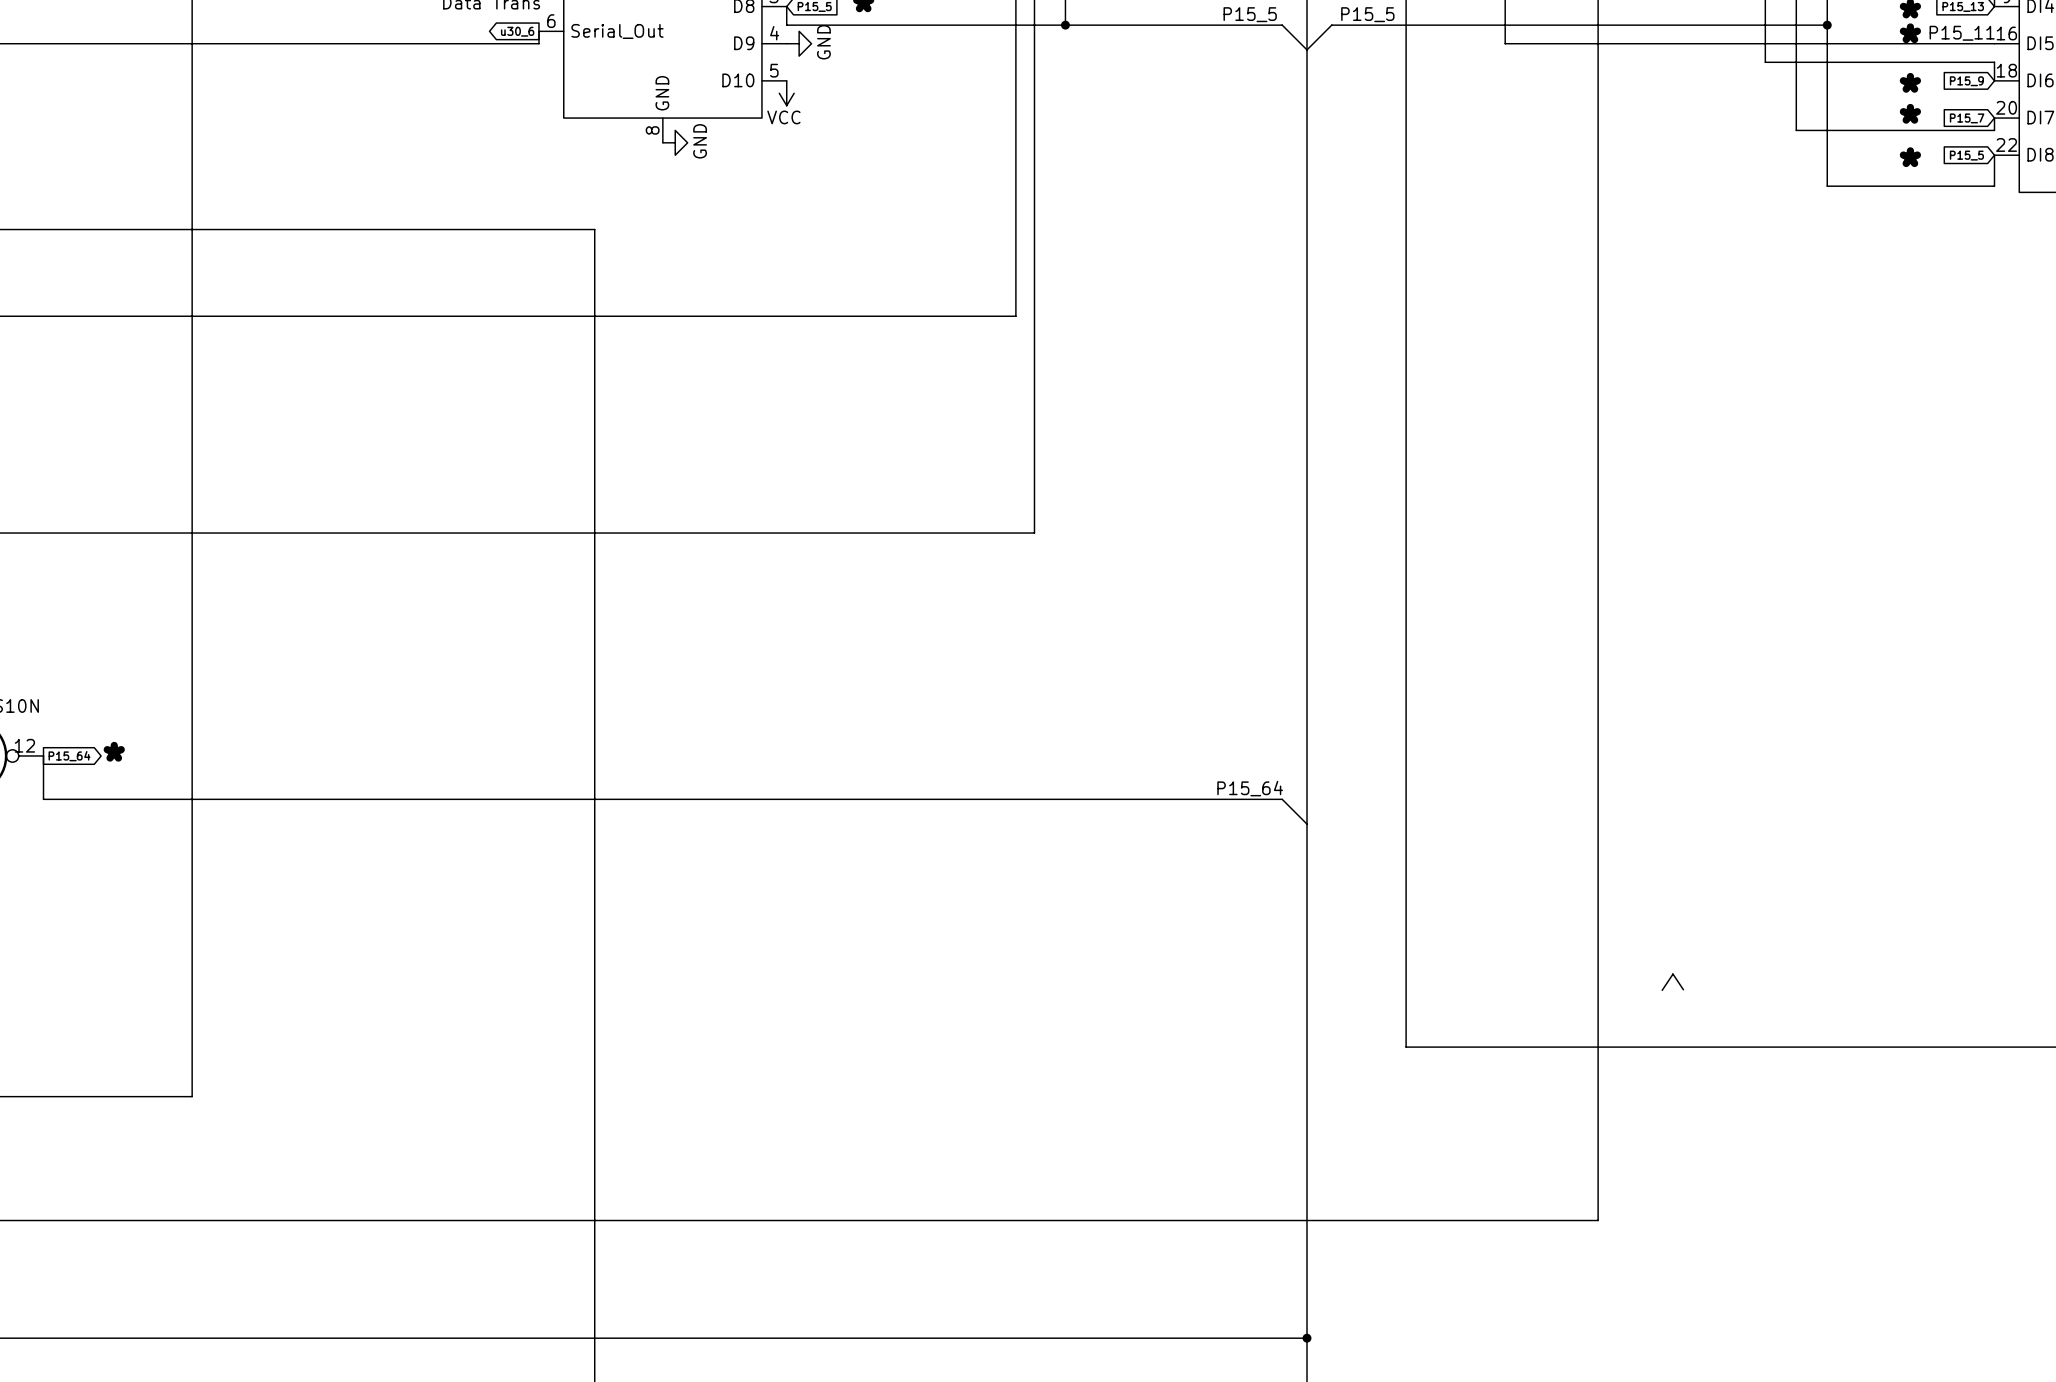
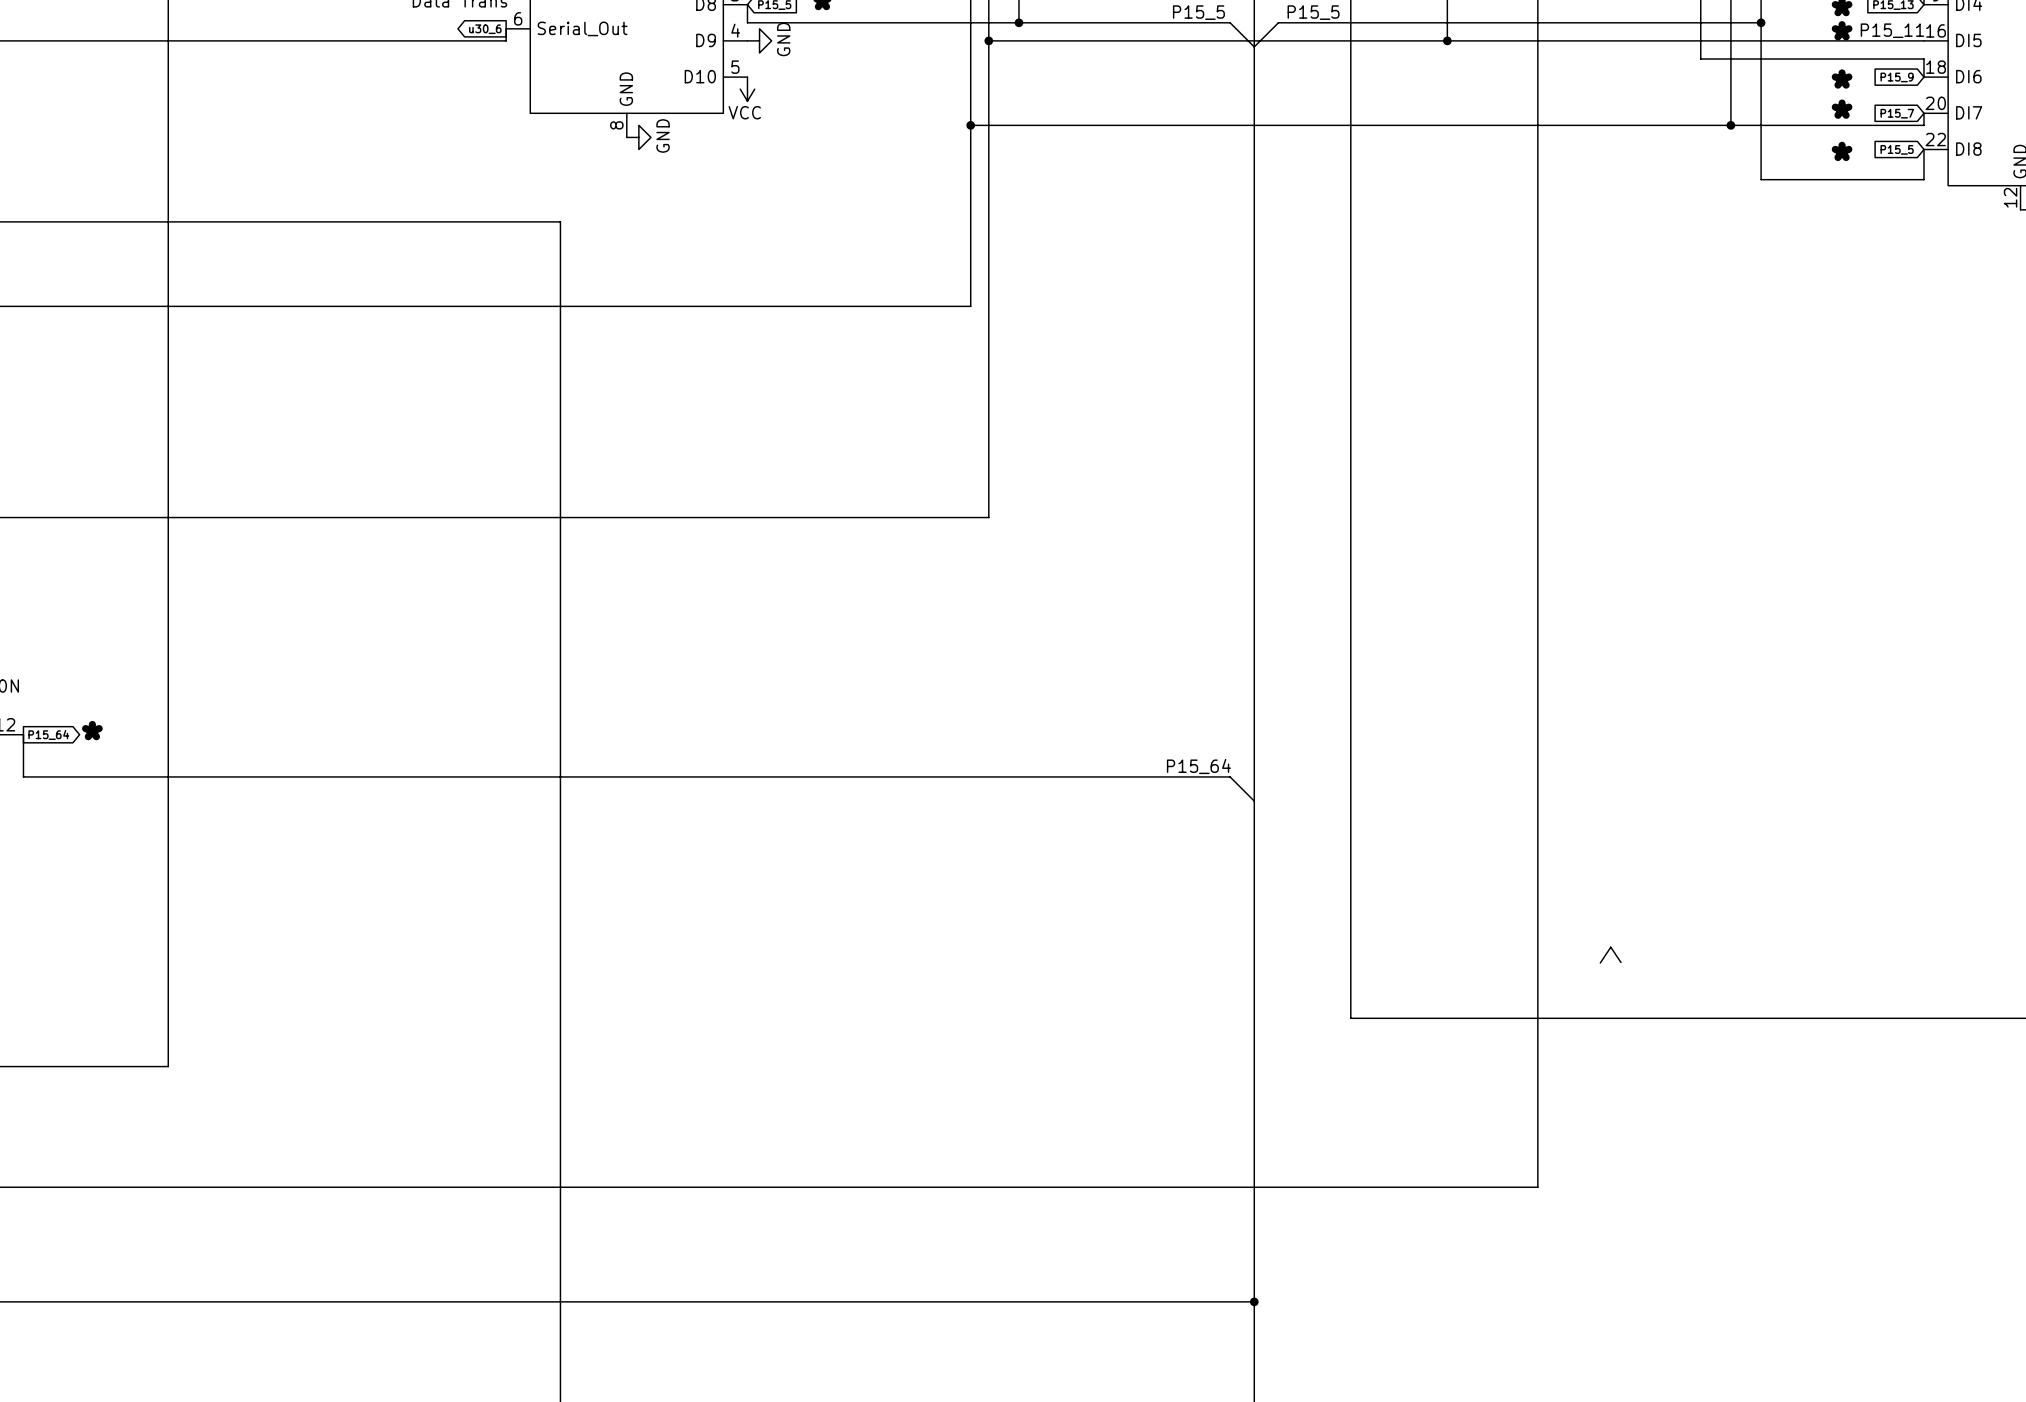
wire: none -> (988, 40) (1447, 40)
junction: none -> (988, 40)
junction: none -> (1447, 40)
wire: none -> (970, 125) (1730, 125)
junction: none -> (970, 125)
junction: none -> (1730, 125)

